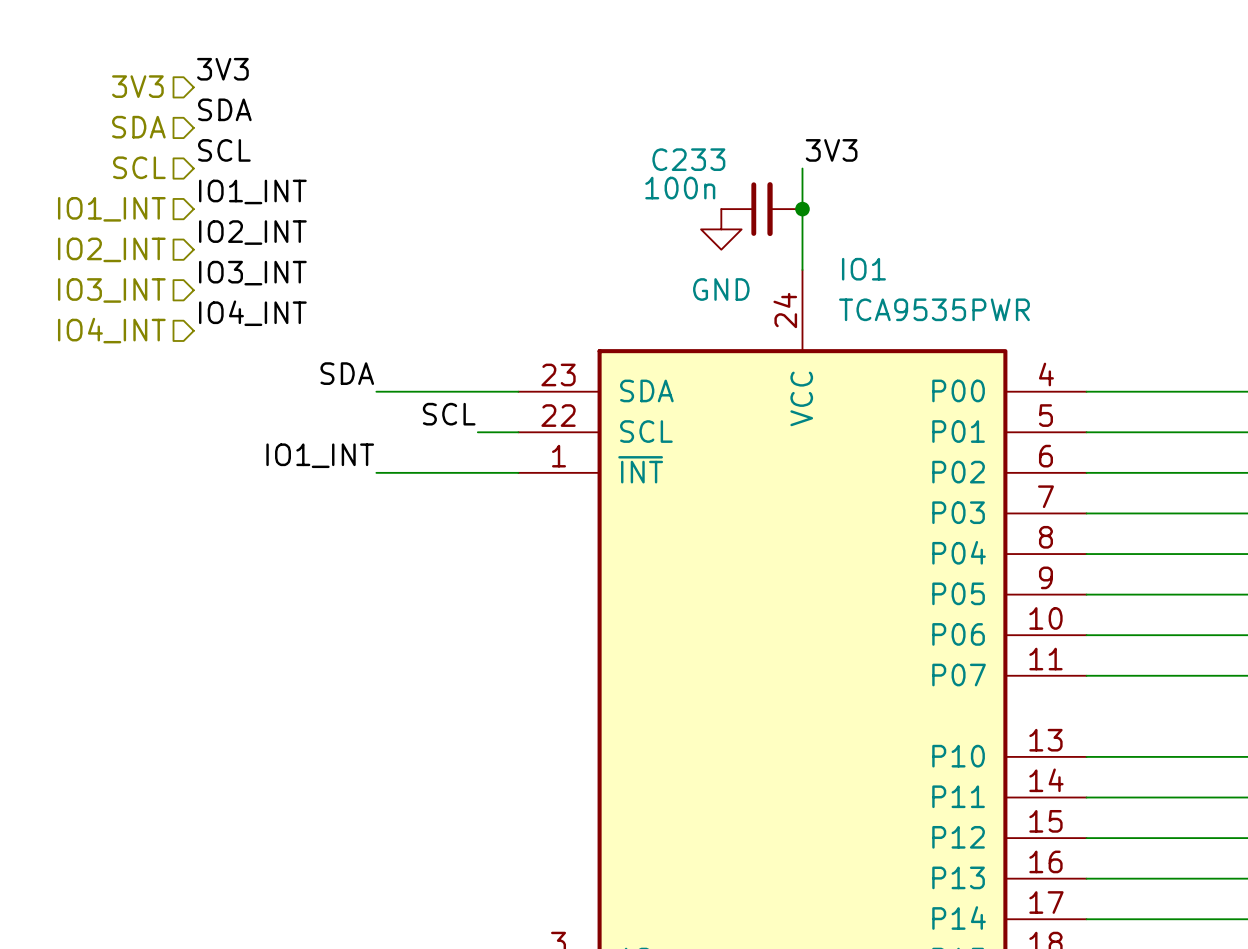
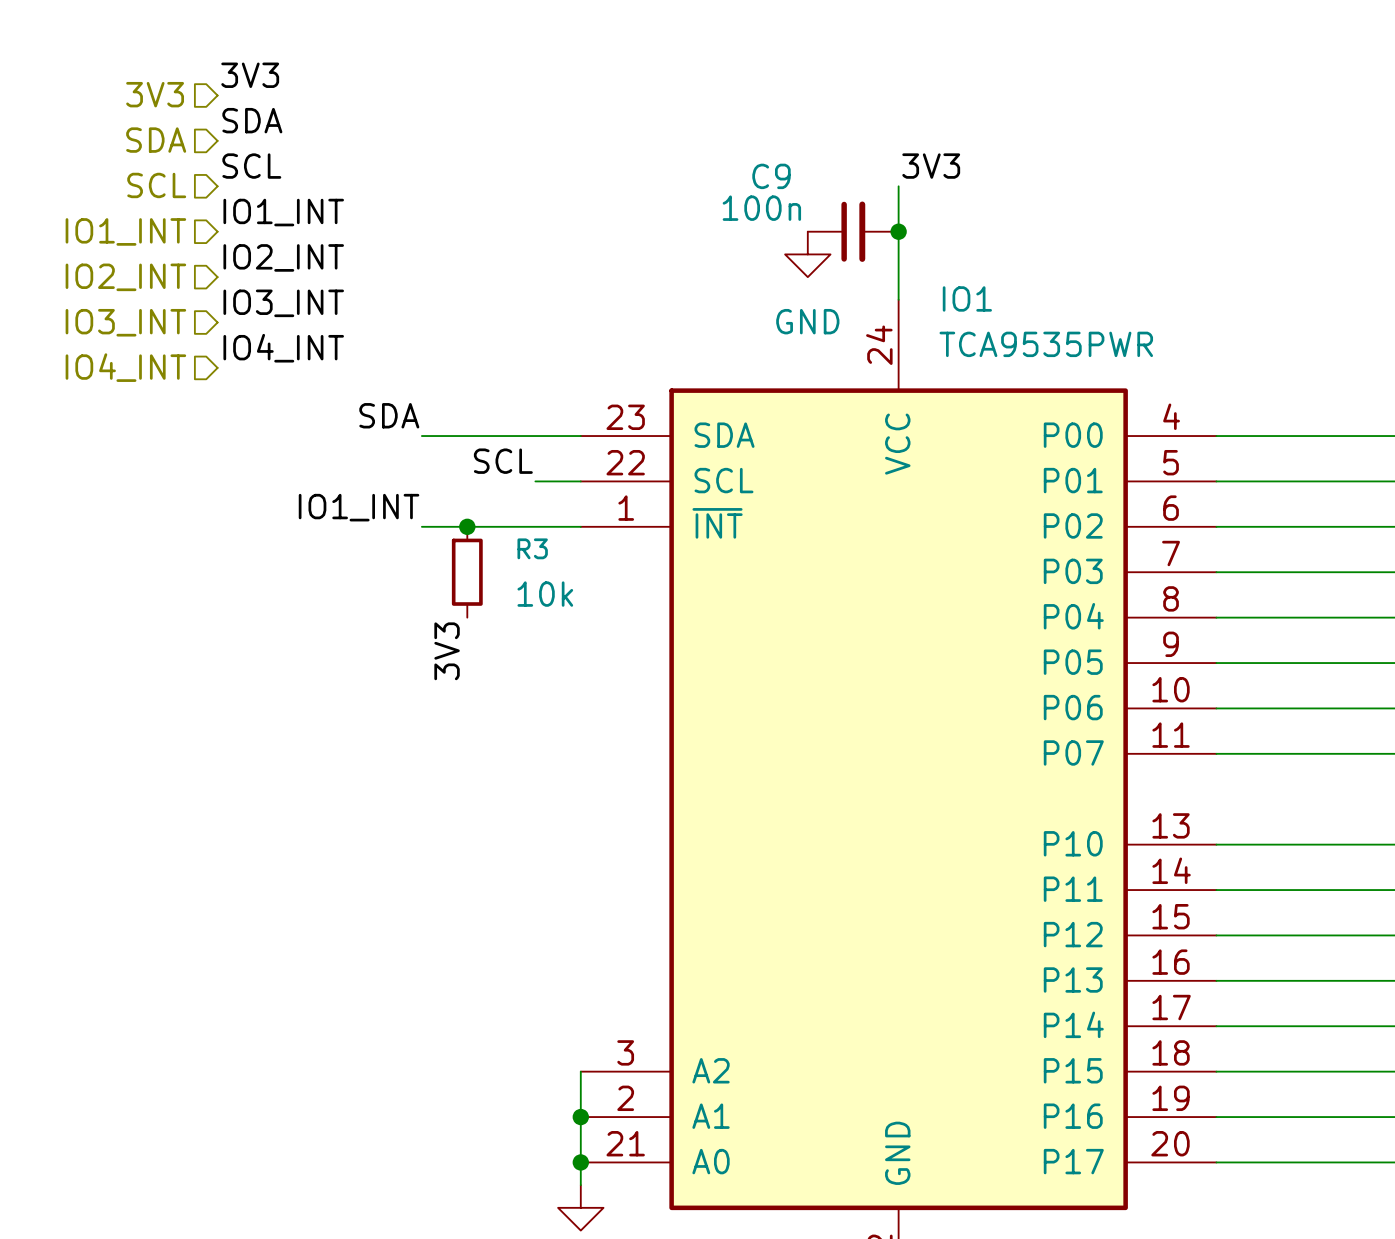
C233 name: C233 (688, 159) -> C9 (771, 176)
junction: none -> (467, 526)
R3: none -> 10k (467, 572)
label: none -> 3V3 (447, 651)

